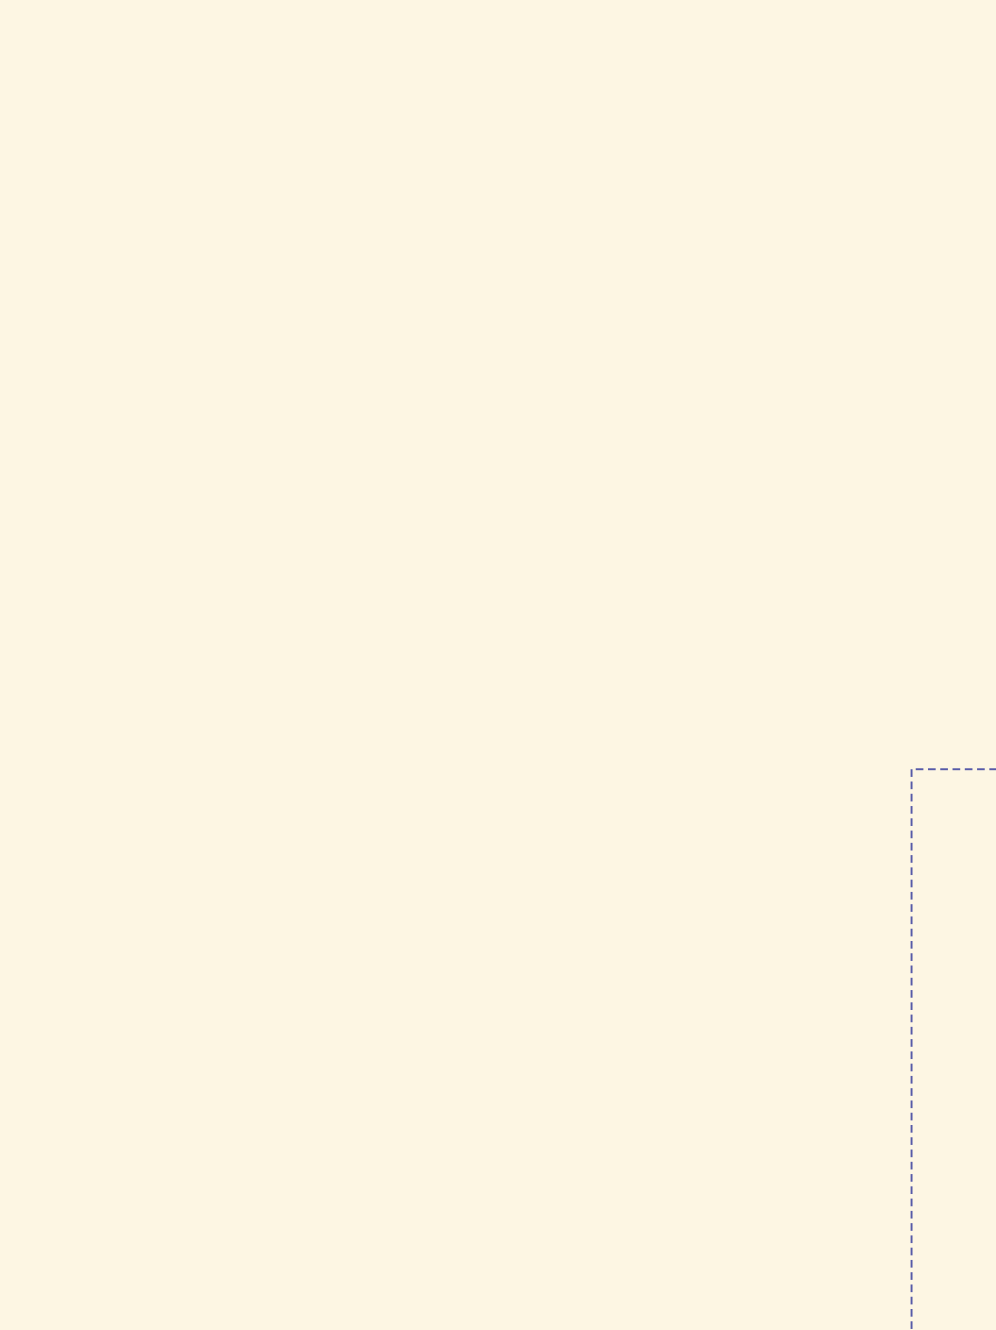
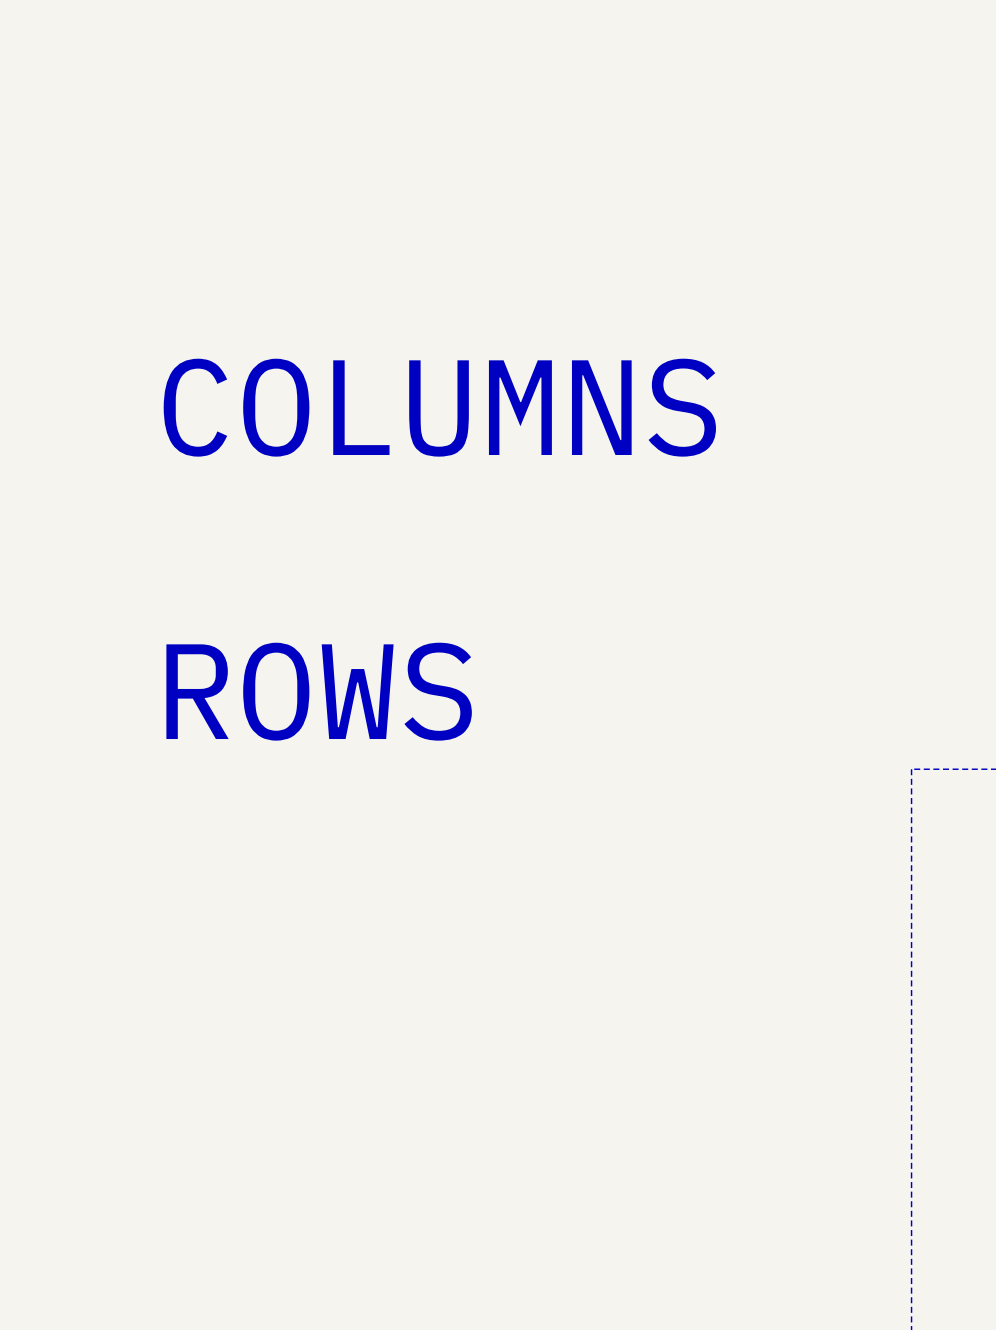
text: none -> COLUMNS (439, 407)
text: none -> ROWS (319, 691)

